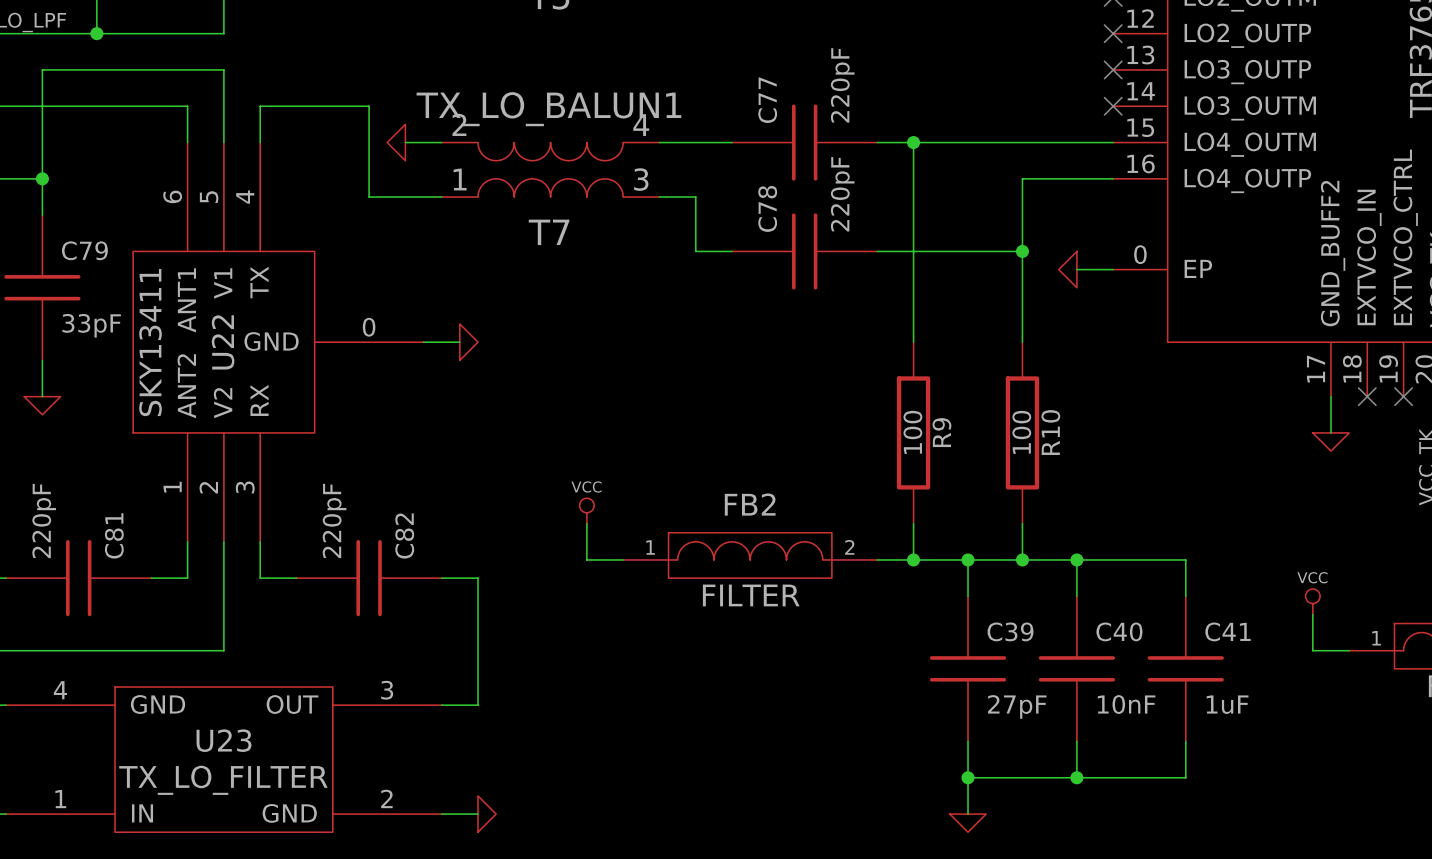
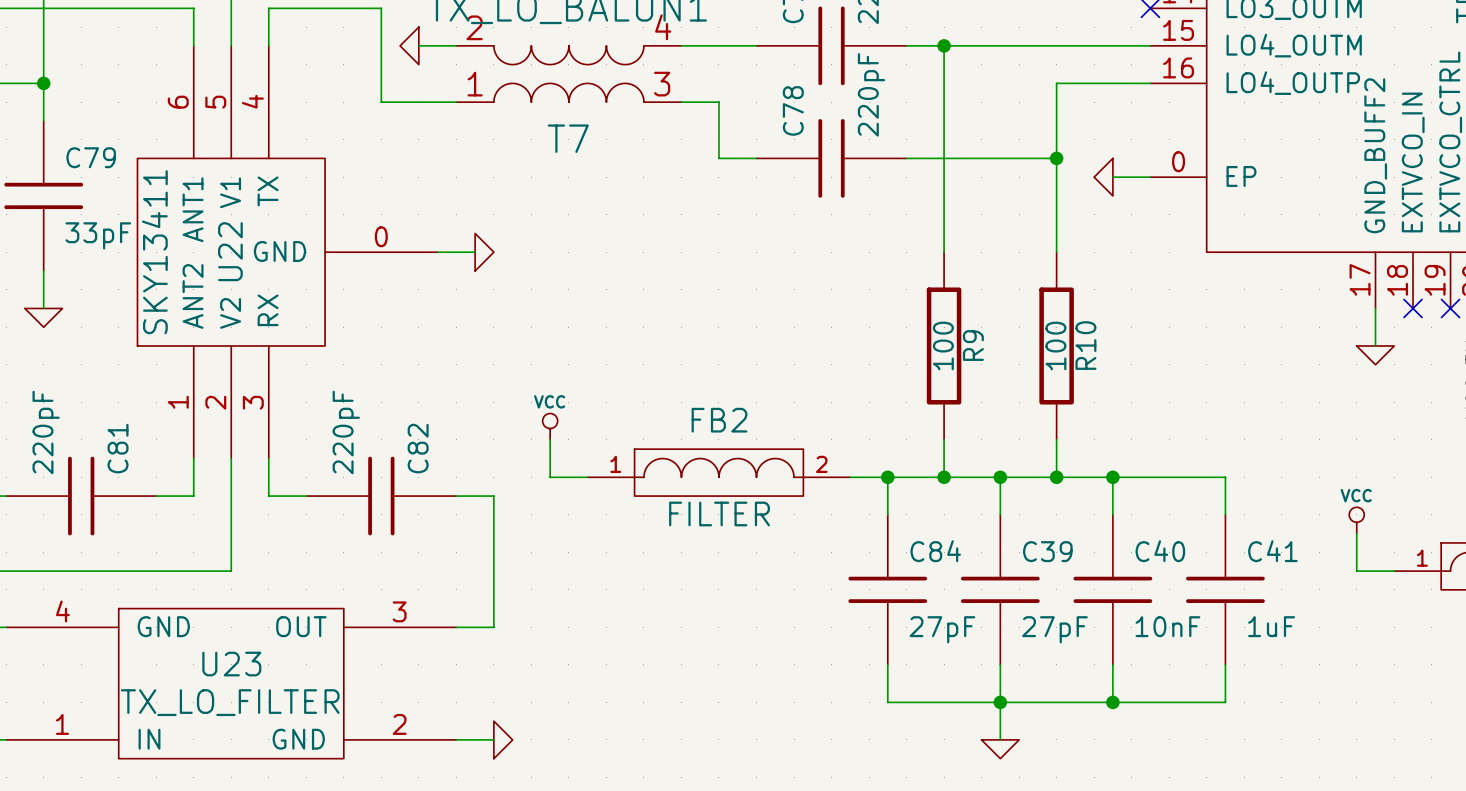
power symbol position: VCC (586, 510) -> VCC (550, 426)
wire: (586, 523) (586, 559) (623, 559) -> (550, 439) (550, 477) (587, 477)
FB2 position: (750, 555) -> (718, 472)
wire: none -> (887, 477) (887, 514)
junction: none -> (887, 477)
C84: none -> 27pF (887, 589)
wire: none -> (887, 664) (887, 702) (1000, 702)

